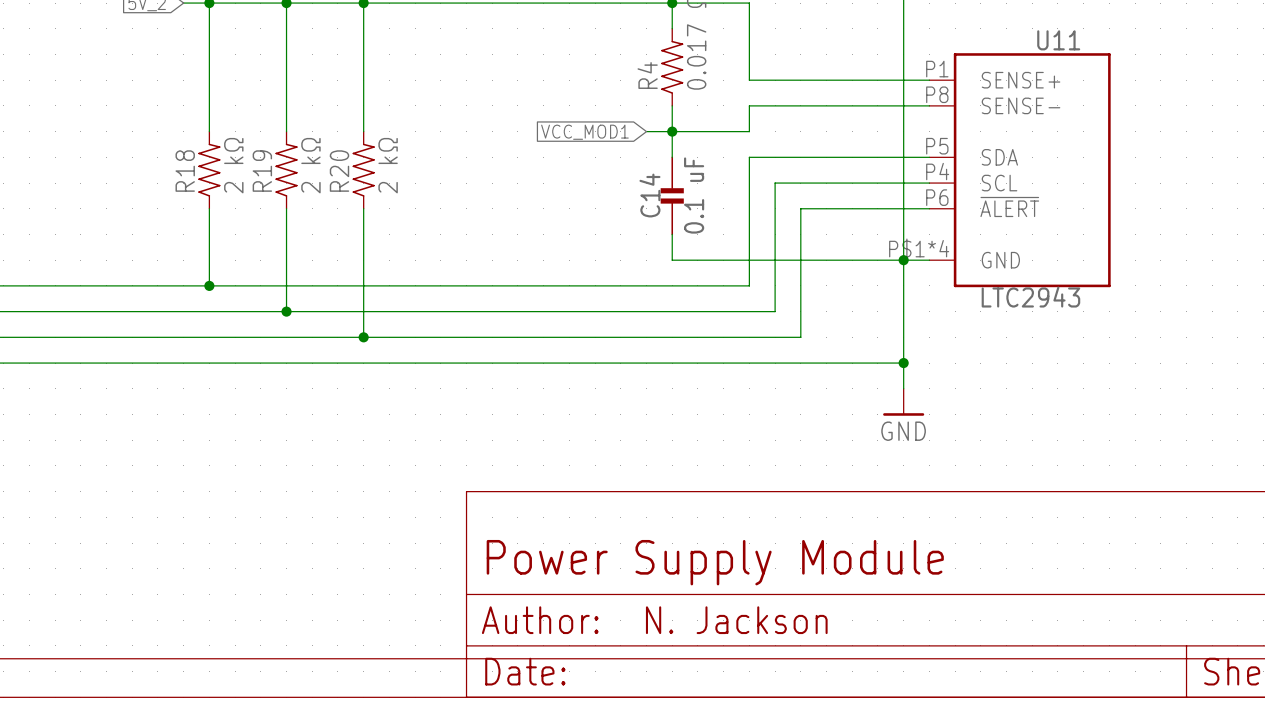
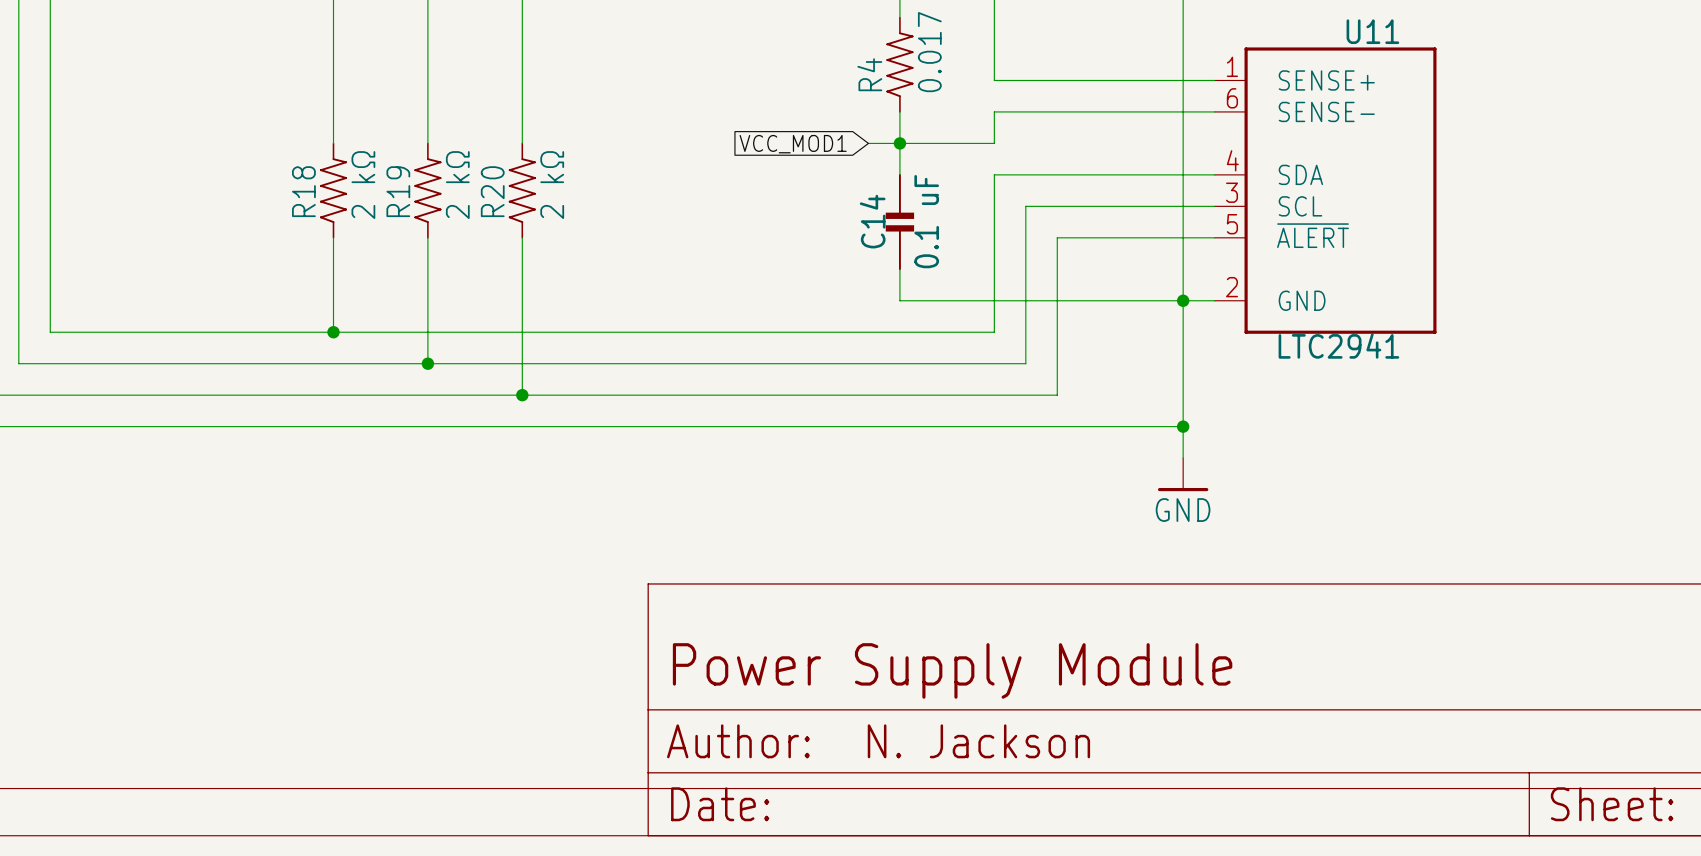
U11 pin number: P1 (937, 69) -> 1 (1232, 66)
U11 pin number: P8 (937, 94) -> 6 (1232, 98)
U11 pin number: P5 (937, 146) -> 4 (1232, 160)
U11 pin number: P4 (937, 171) -> 3 (1232, 192)
U11 pin number: P6 (937, 197) -> 5 (1232, 224)
U11 pin number: P$1*4 (919, 249) -> 2 (1232, 287)
U11 value: LTC2943 (1030, 297) -> LTC2941 (1338, 345)

